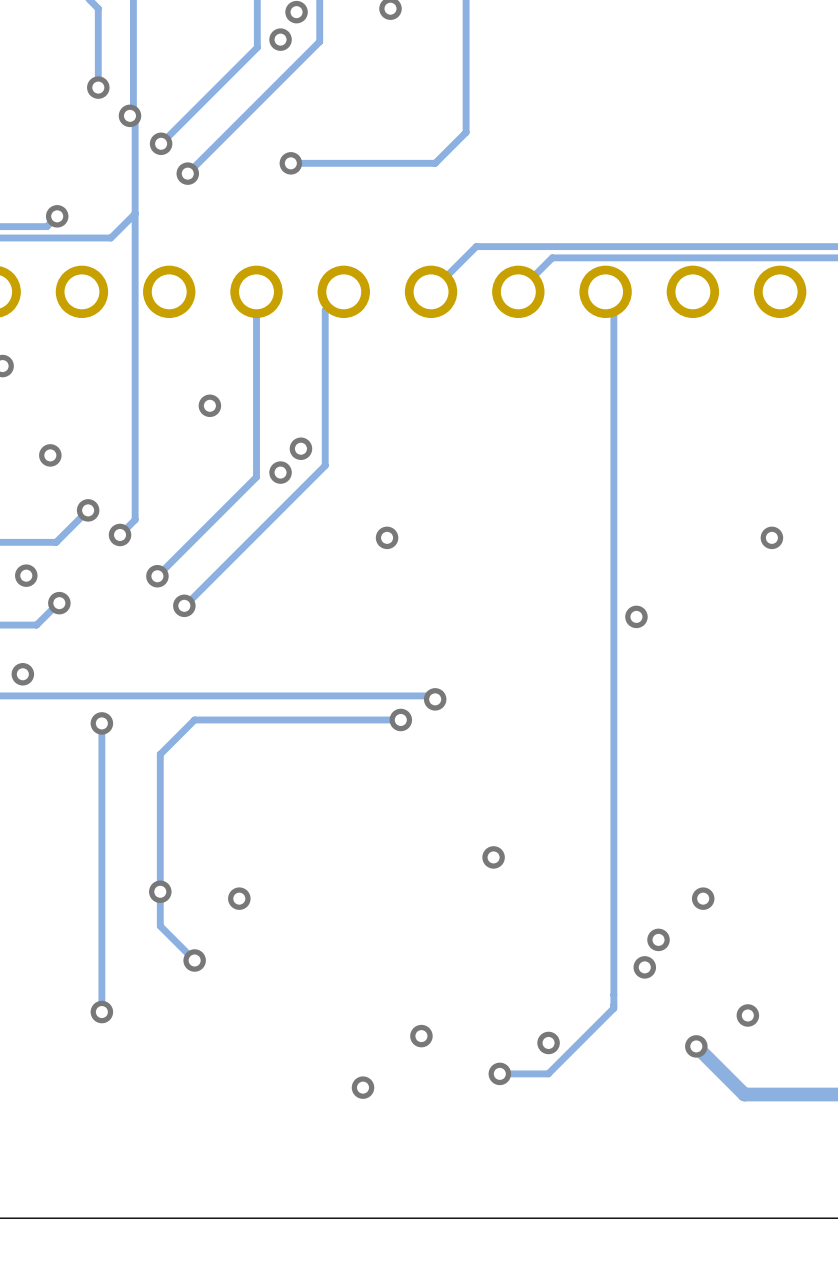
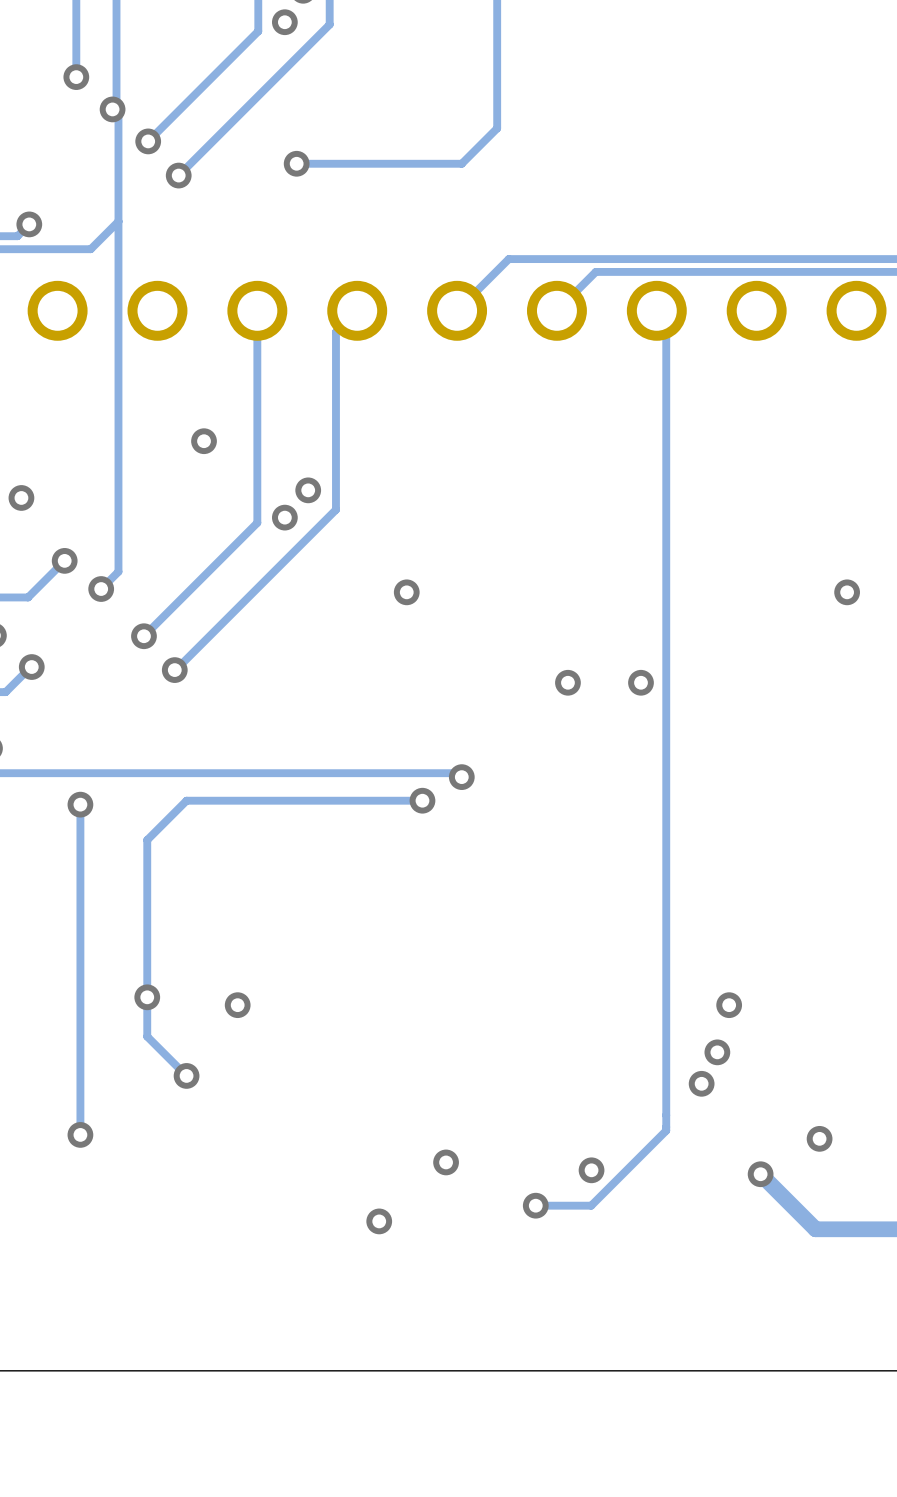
via: none -> (567, 682)
via position: (636, 616) -> (640, 682)
via: (493, 857) -> none
via position: (703, 898) -> (729, 1005)

